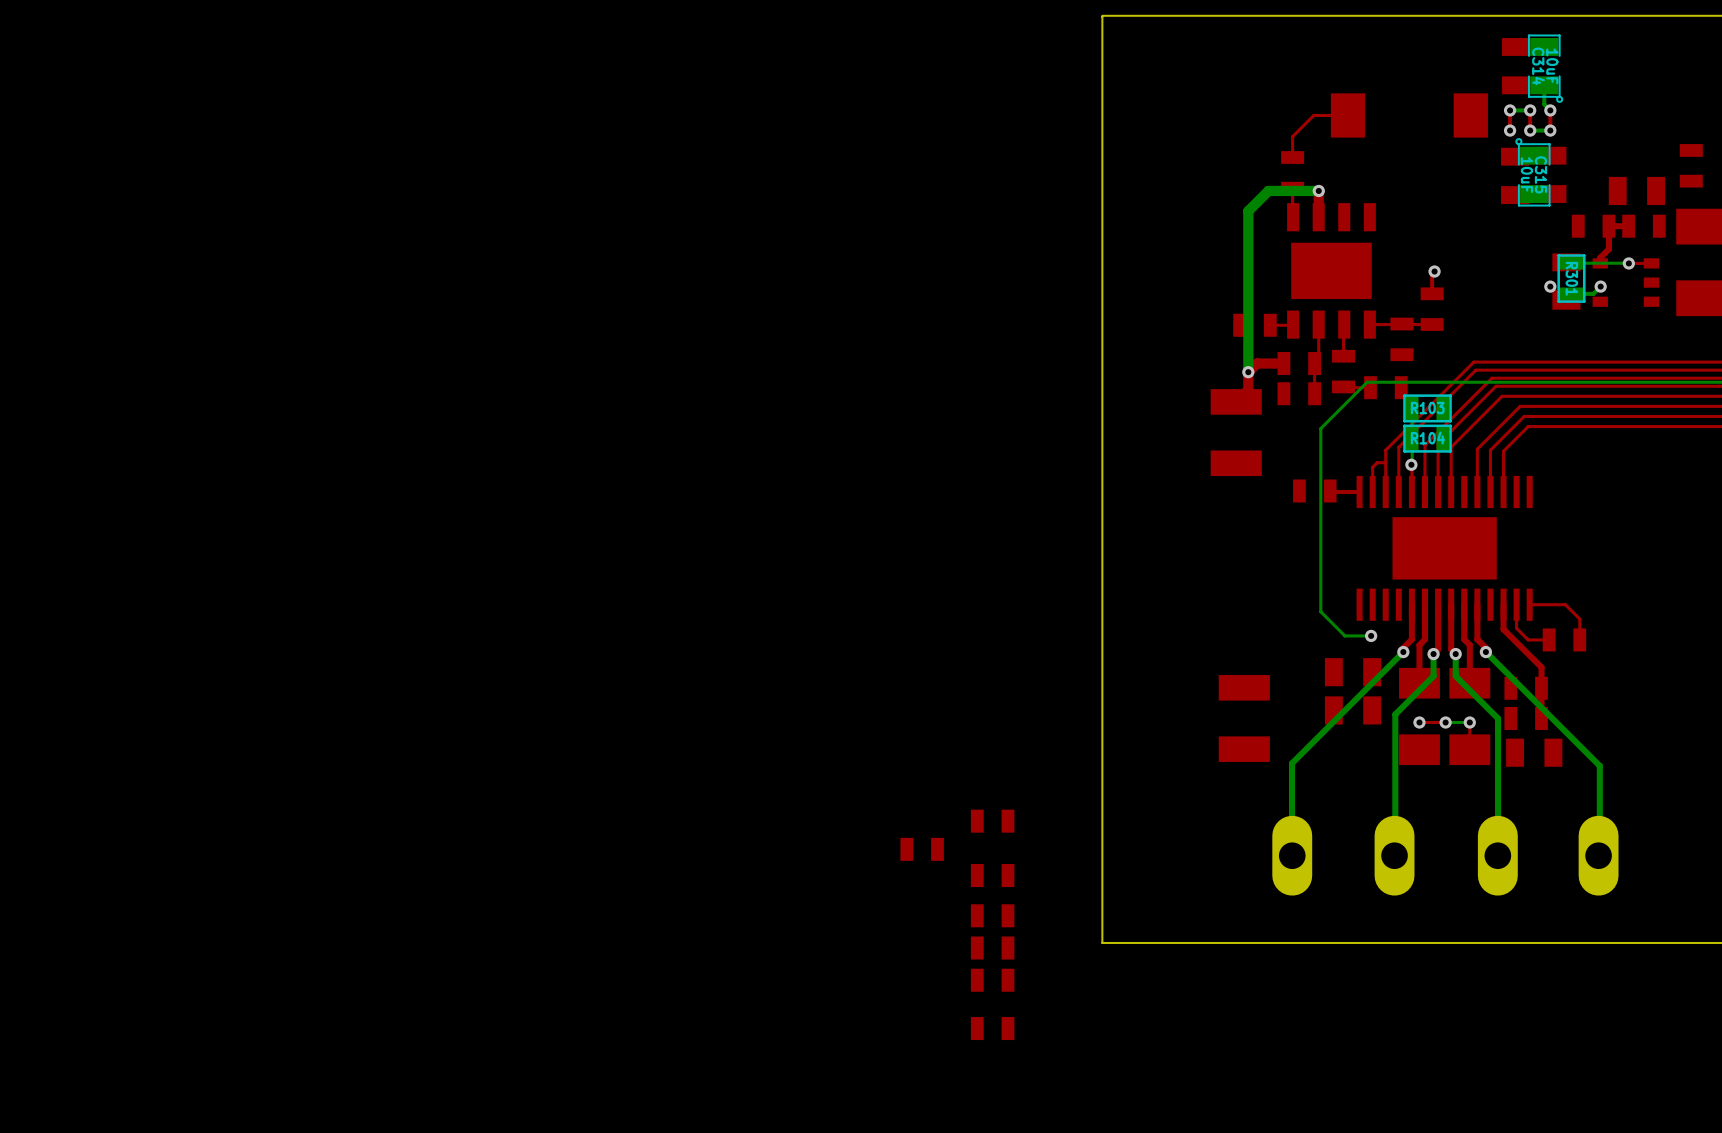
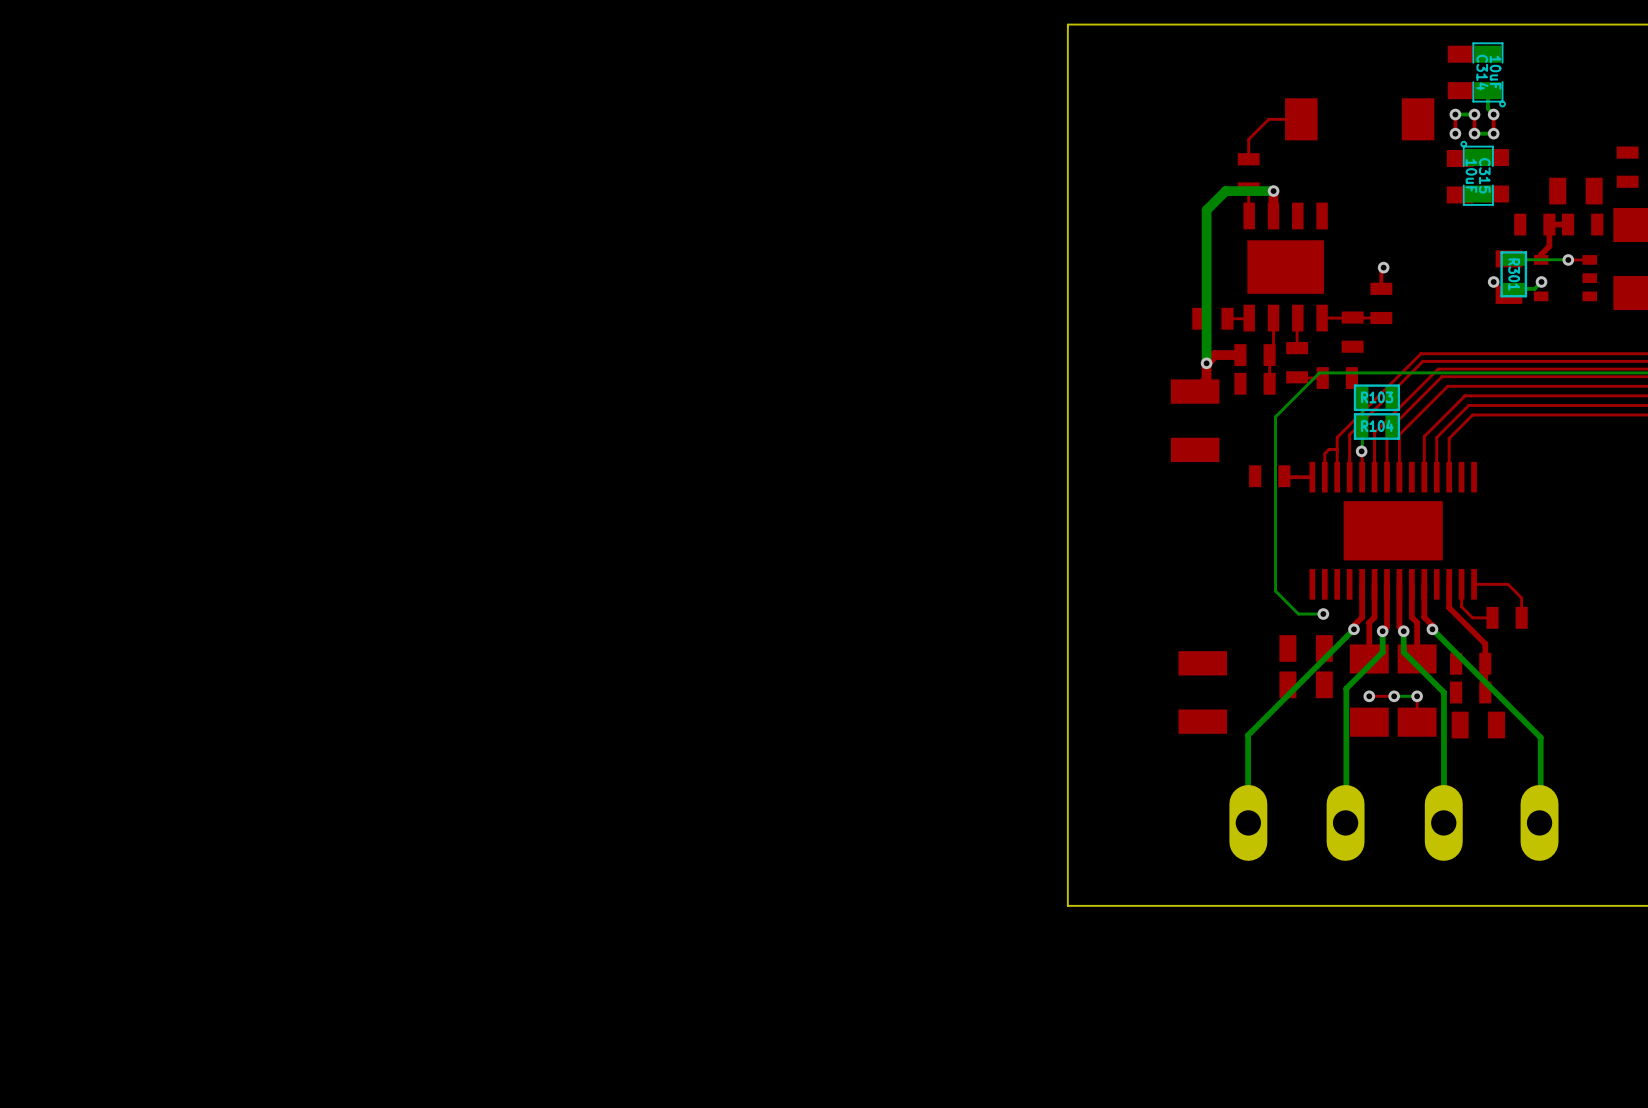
part: (992, 821) -> none
part: (922, 849) -> none
part: (992, 875) -> none
part: (992, 915) -> none
part: (992, 948) -> none
part: (992, 980) -> none
part: (992, 1028) -> none

